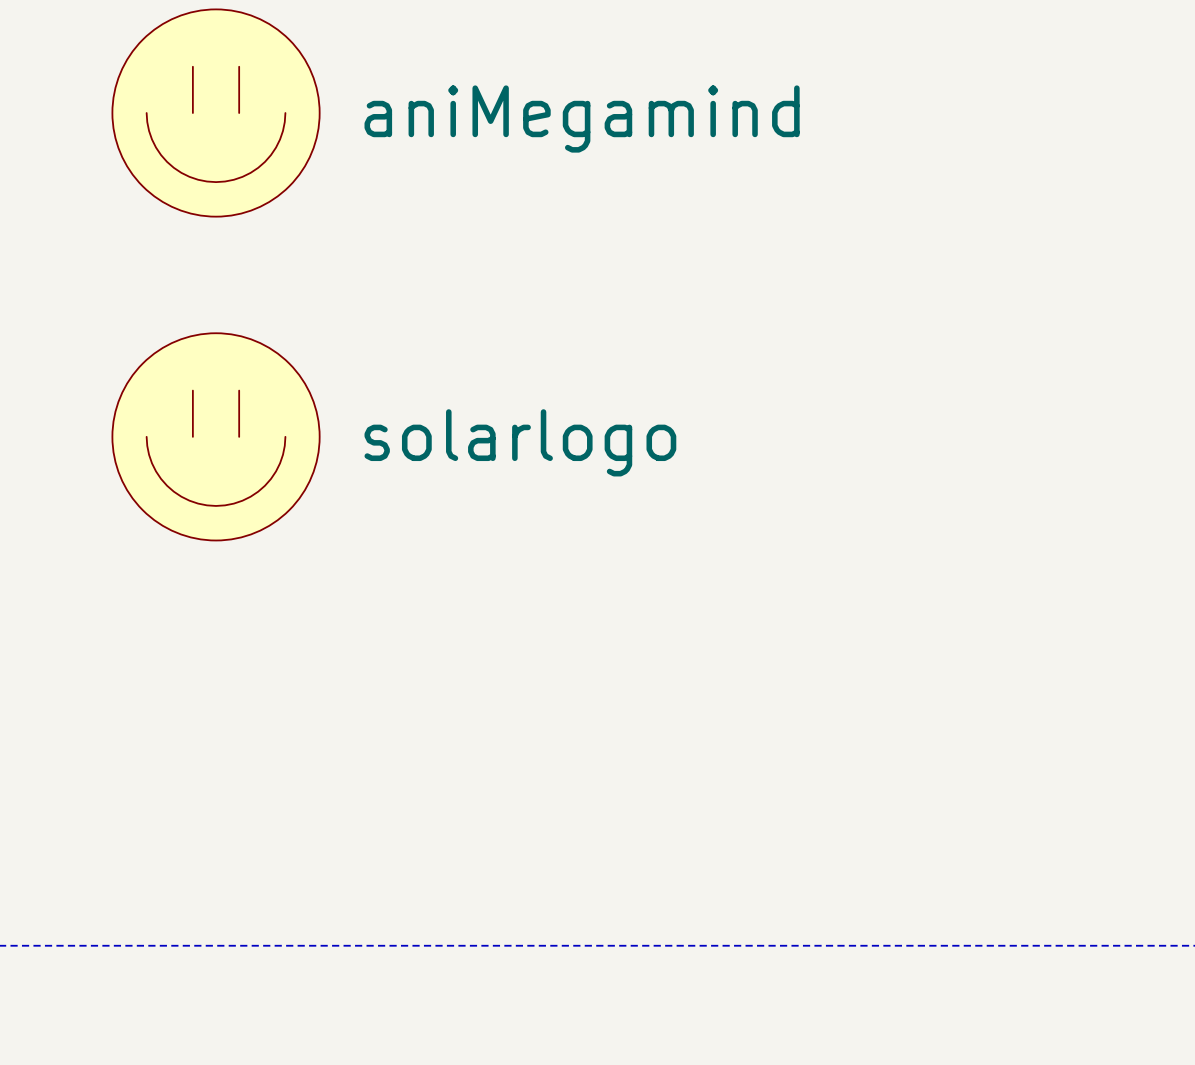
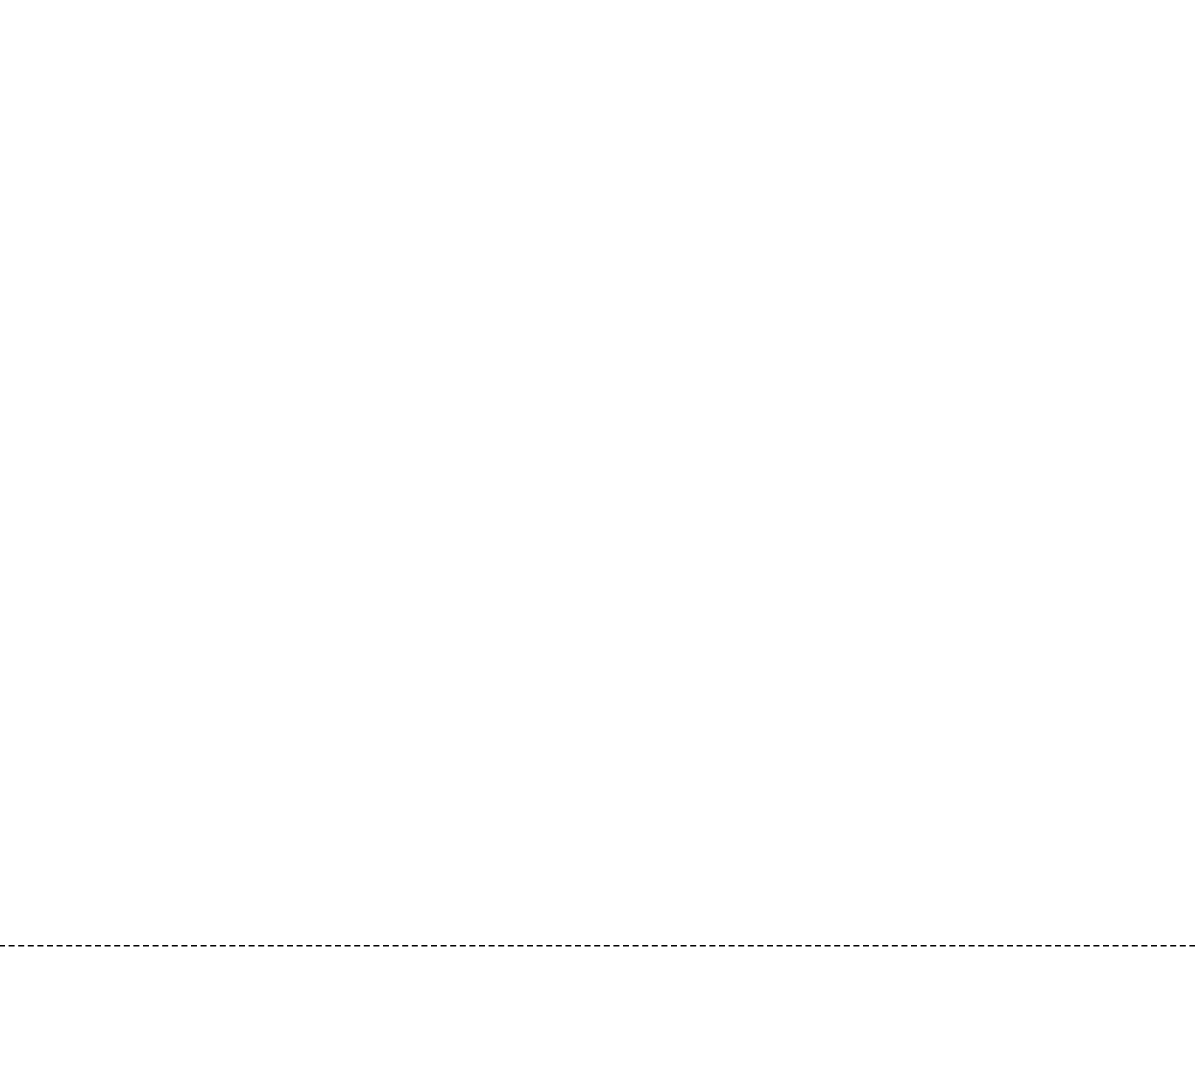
part: aniMegamind (216, 113) -> none
part: solarlogo (216, 436) -> none

